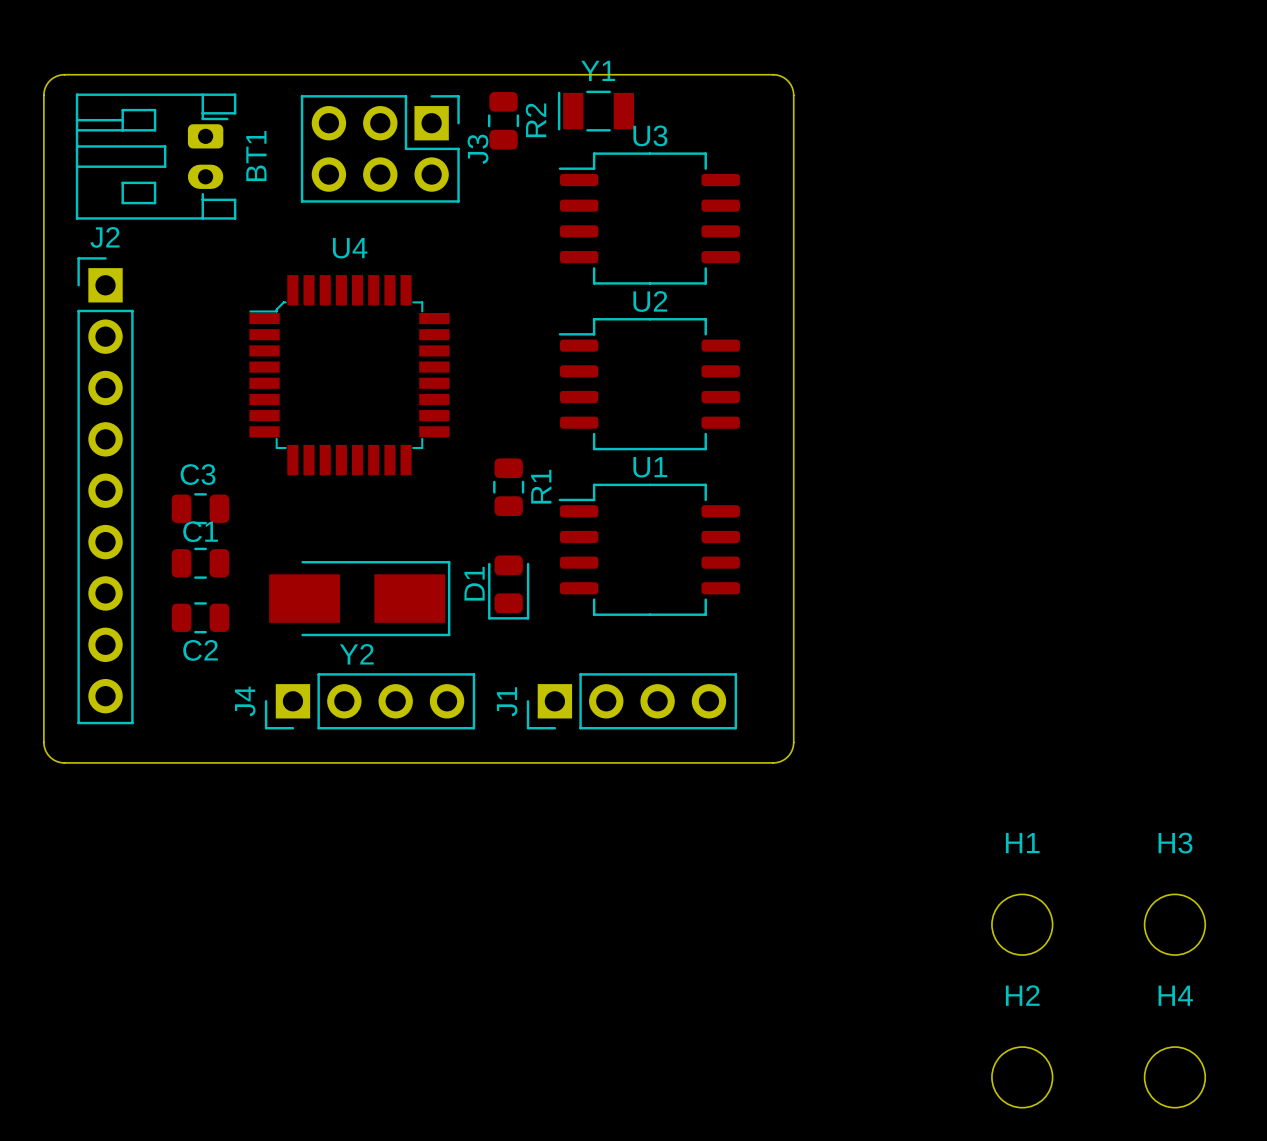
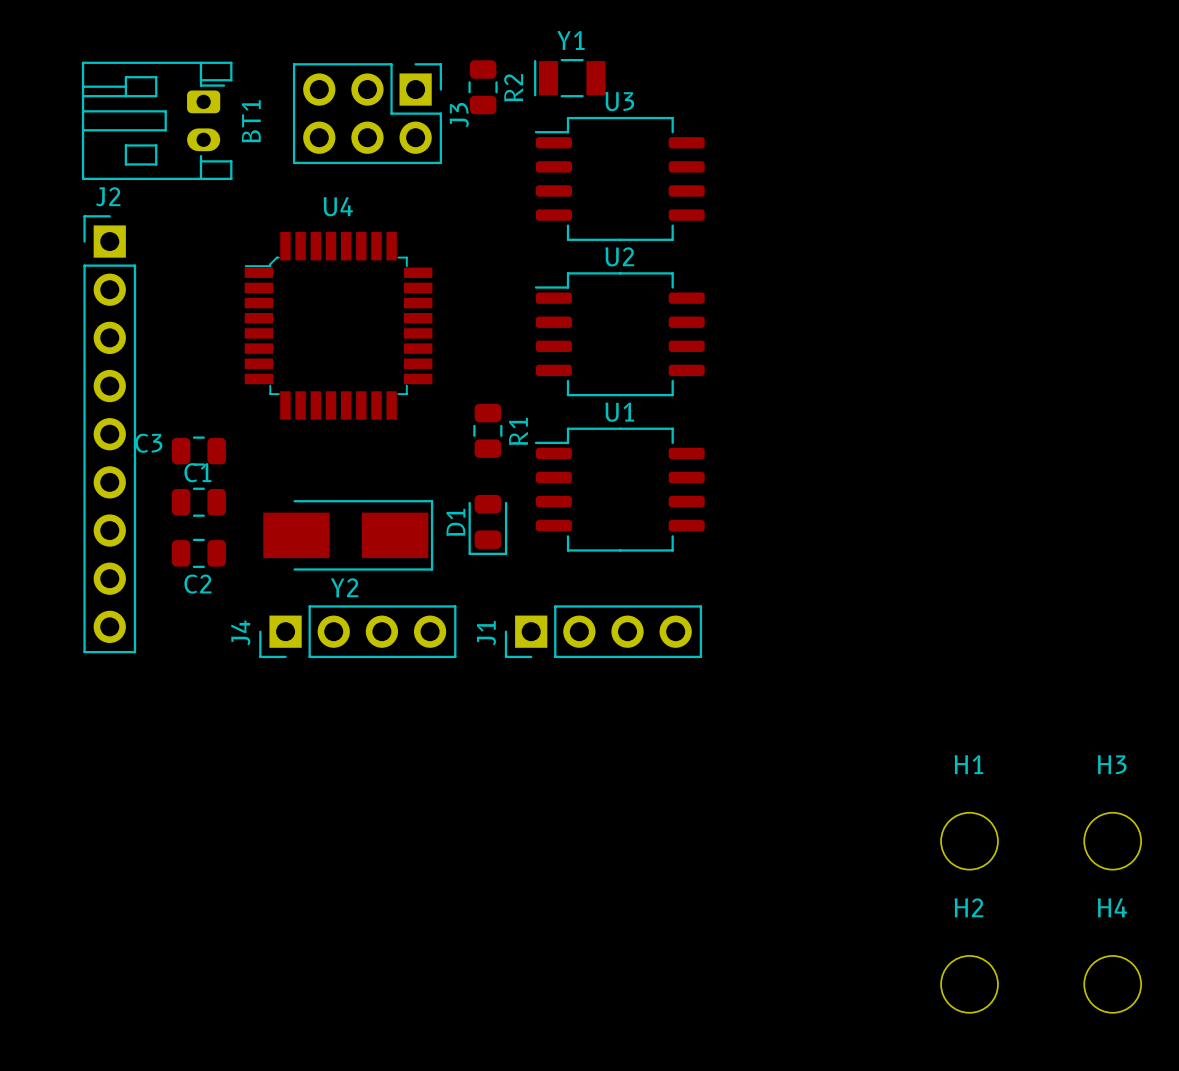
board edge: (64, 74) (773, 74) (781, 76) (787, 80) (792, 87) (793, 95) (793, 742) (792, 750) (787, 756) (781, 761) (773, 762) (64, 762) (56, 761) (49, 756) (45, 750) (43, 742) (43, 95) (45, 87) (49, 80) (56, 76) (64, 74) -> none
C3 name position: C3 (198, 474) -> C3 (148, 443)

